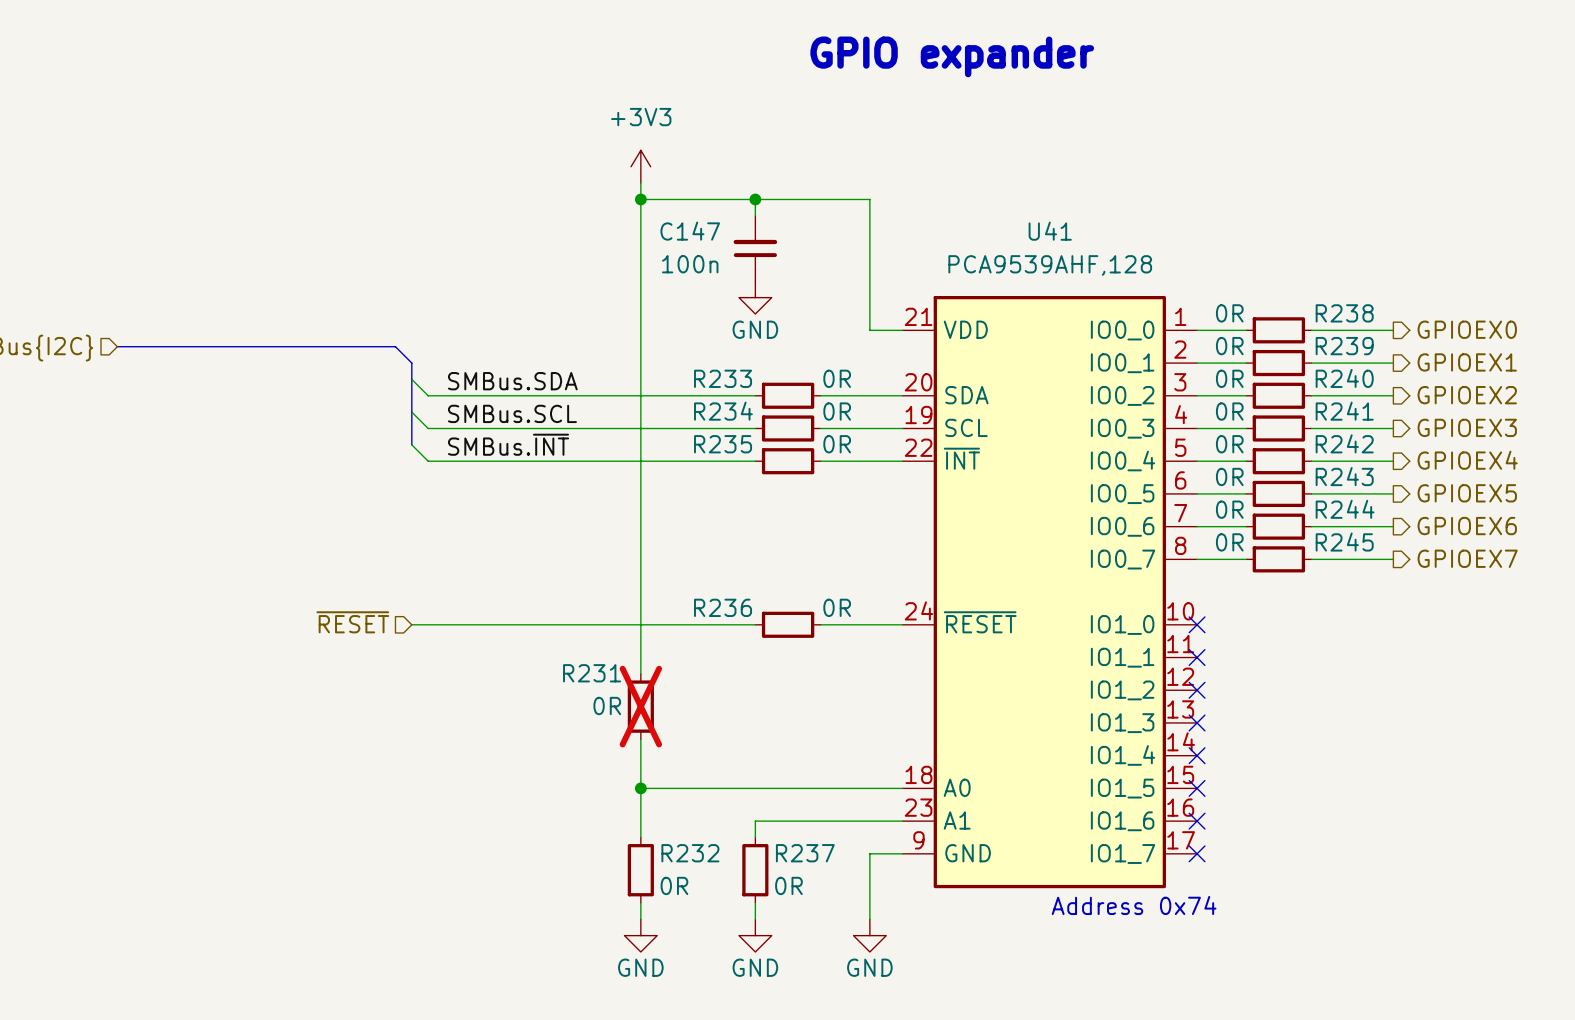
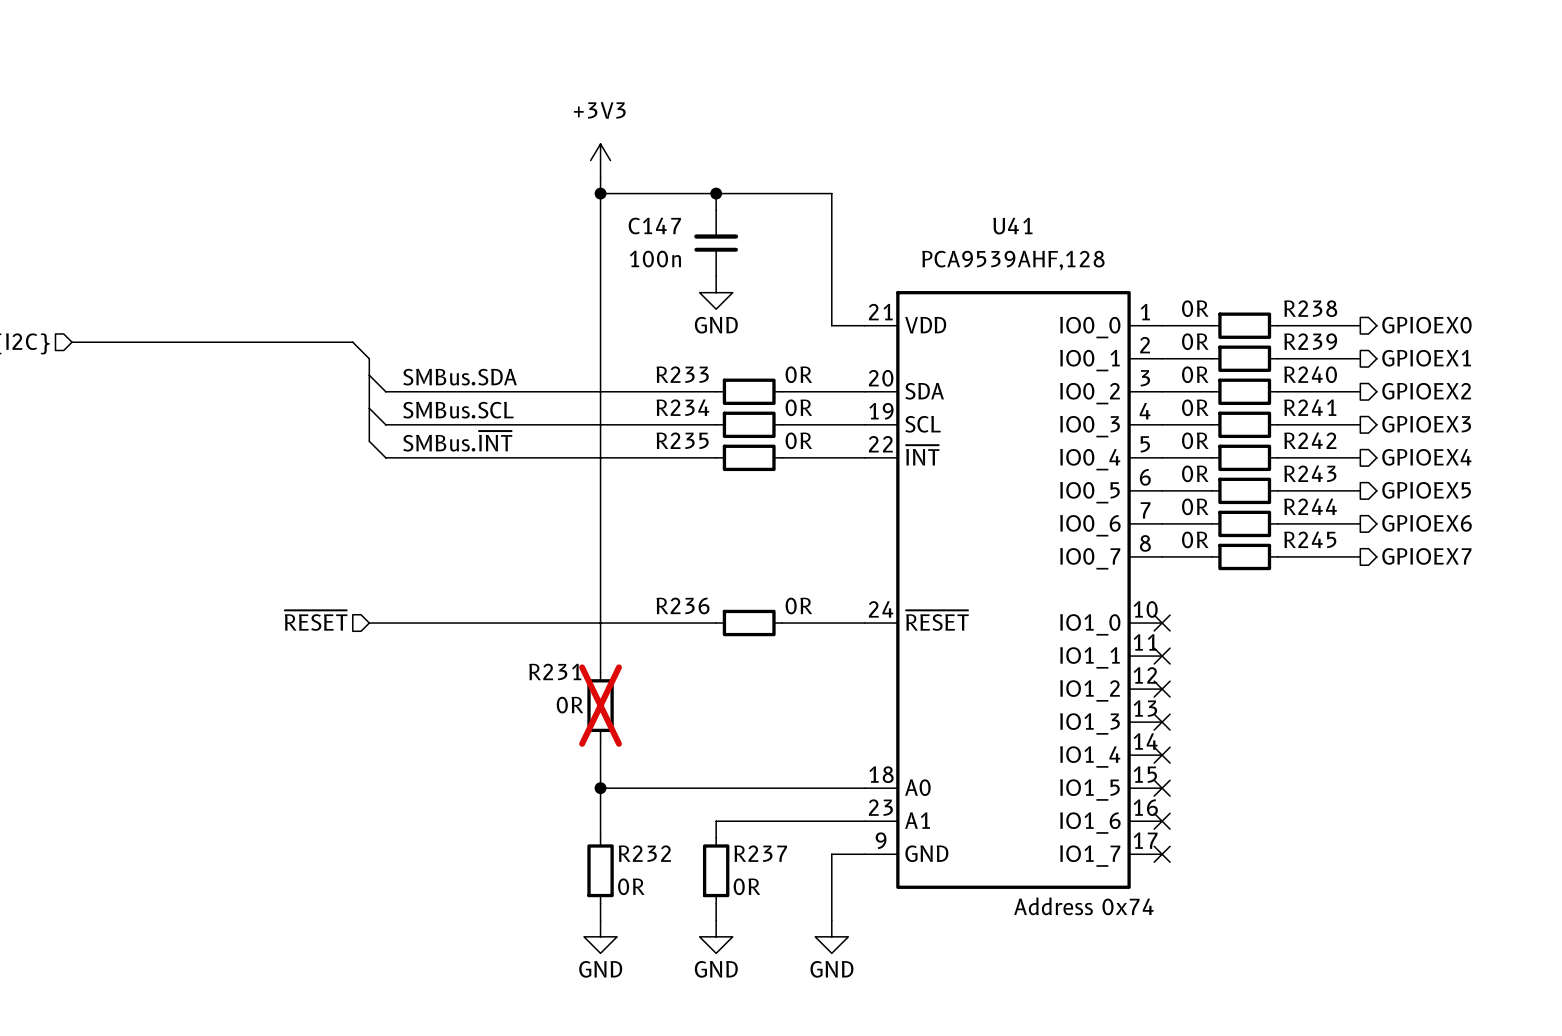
text: GPIO expander (952, 56) -> none

